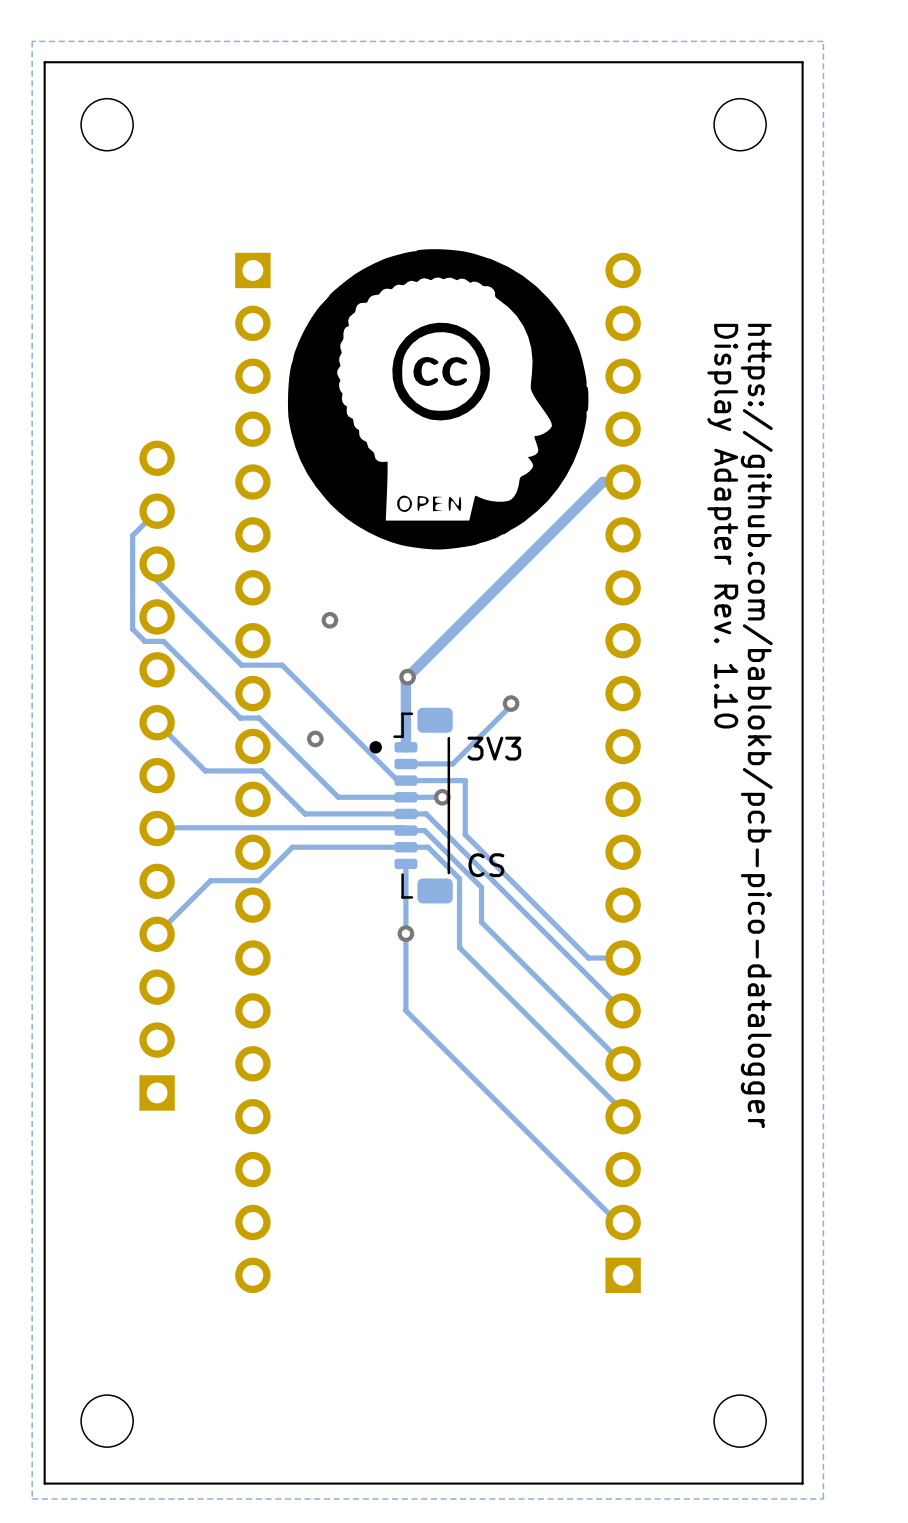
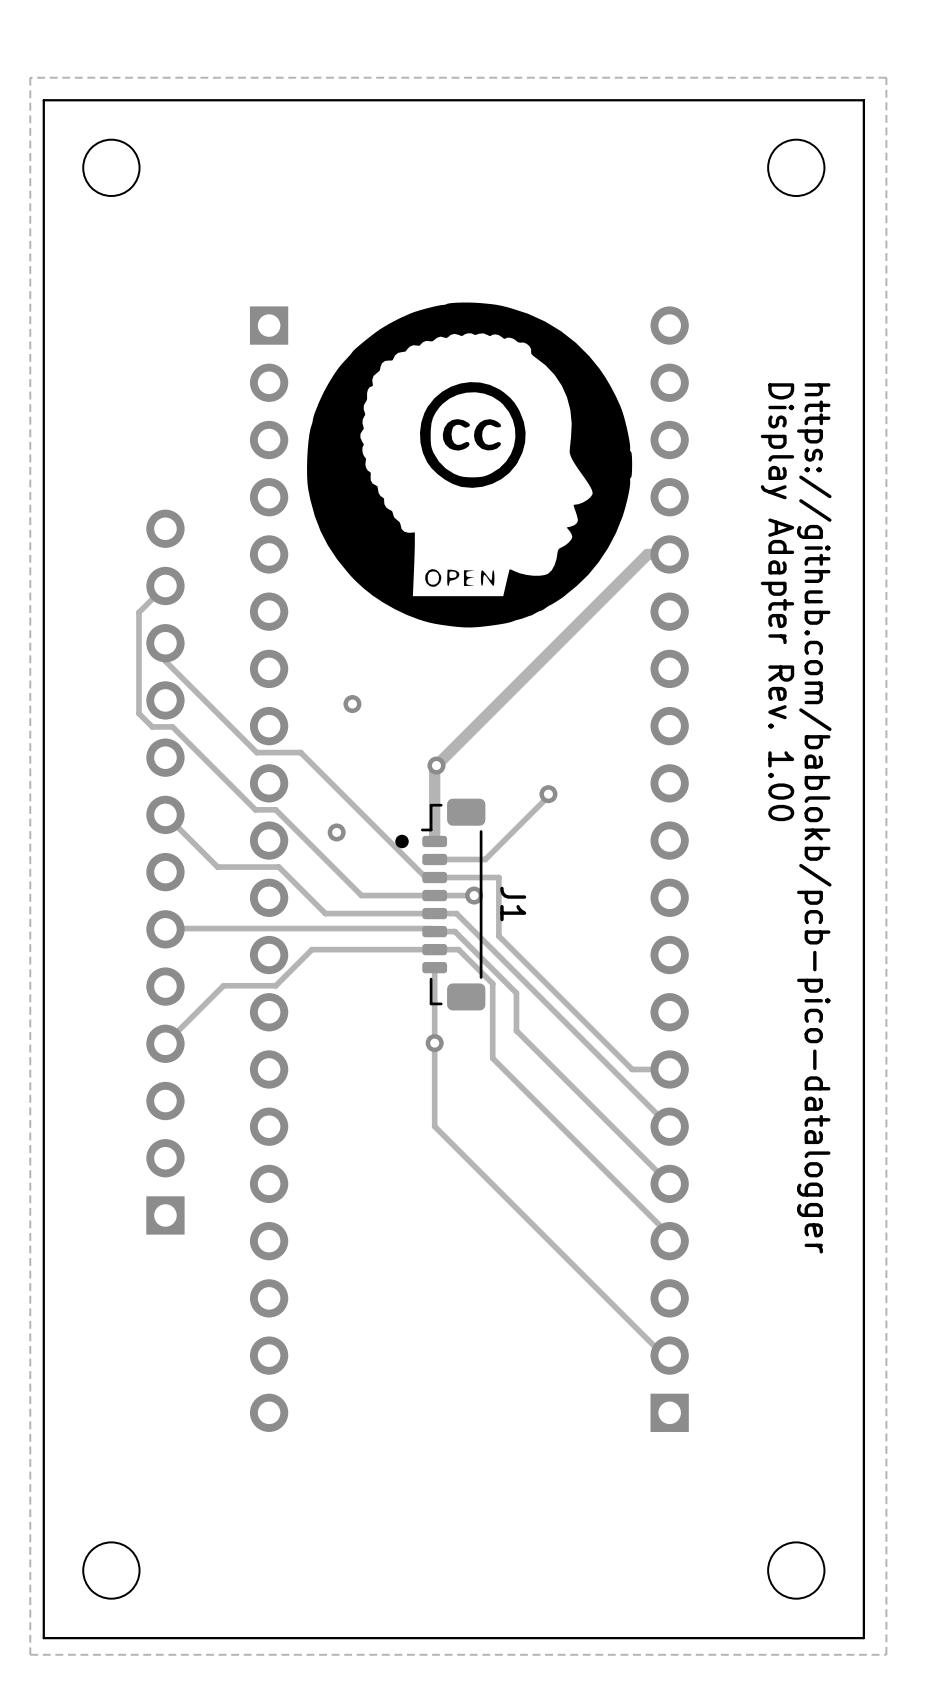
text: Display Adapter Rev. 1.10 (722, 526) -> Display Adapter Rev. 1.00 (777, 602)
text: 3V3 (494, 748) -> none
J1 name: none -> J1 (513, 904)
text: CS (486, 865) -> none

